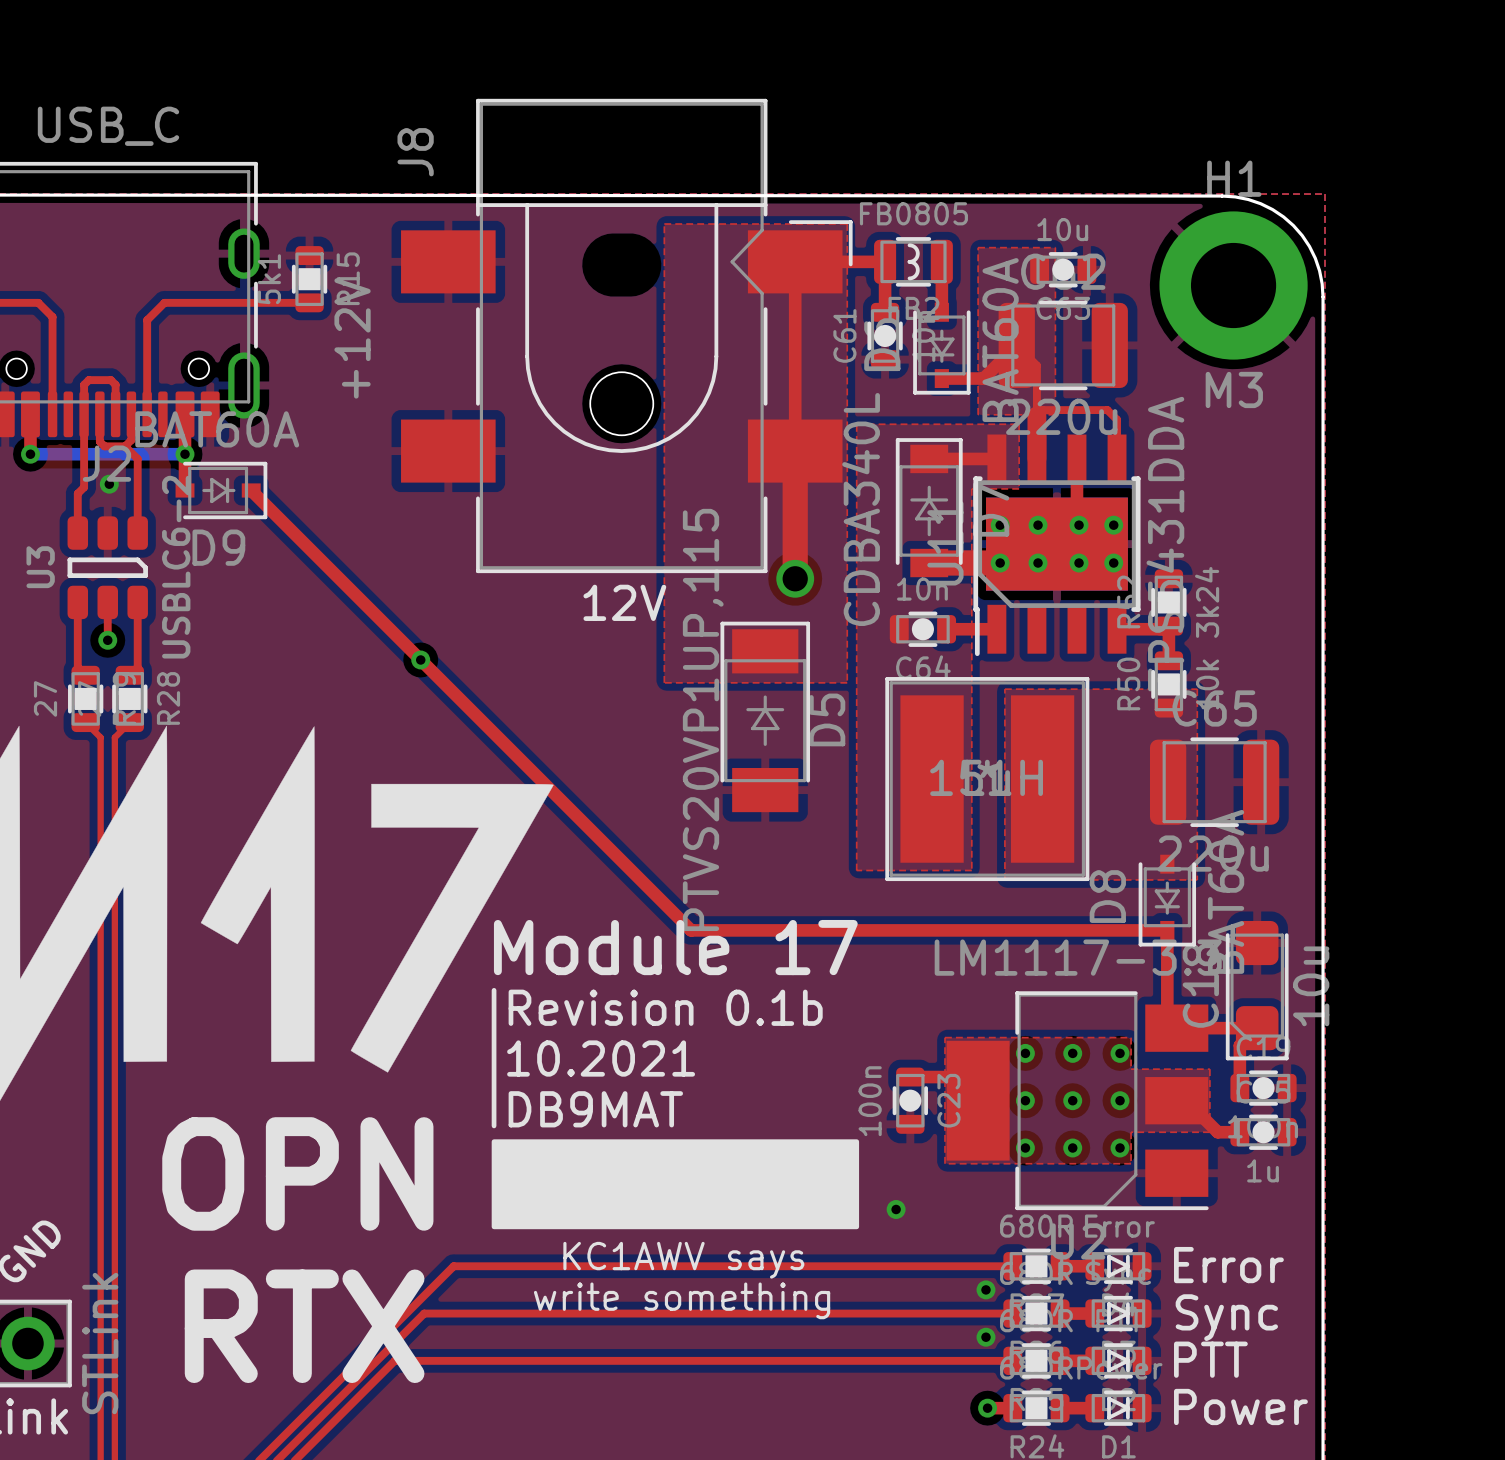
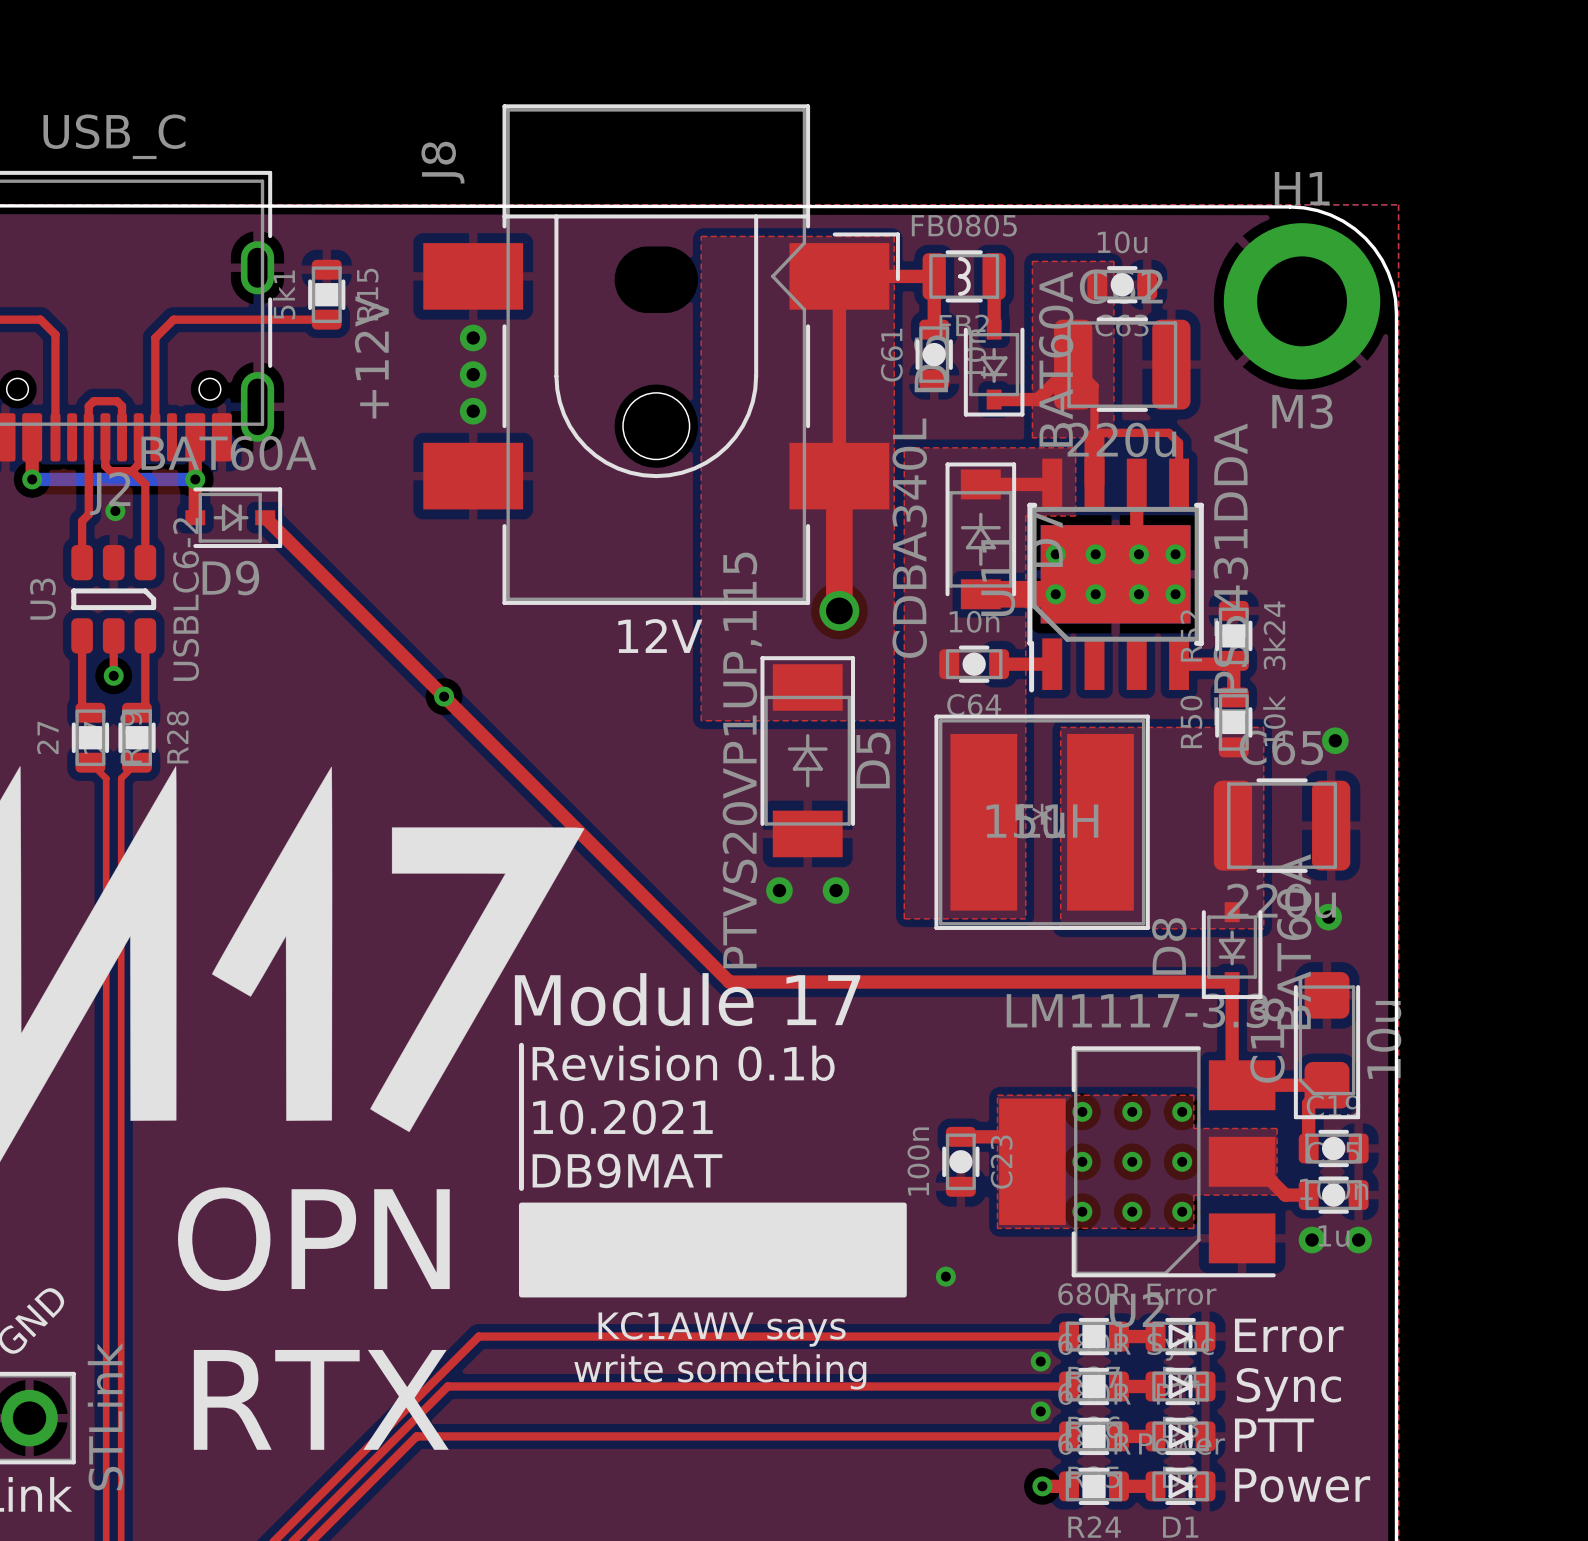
via: none -> (473, 337)
via: none -> (473, 374)
via: none -> (473, 411)
via: none -> (1335, 740)
via: none -> (779, 890)
via: none -> (836, 890)
via: none -> (1328, 917)
via: none -> (1312, 1240)
via: none -> (1358, 1240)

